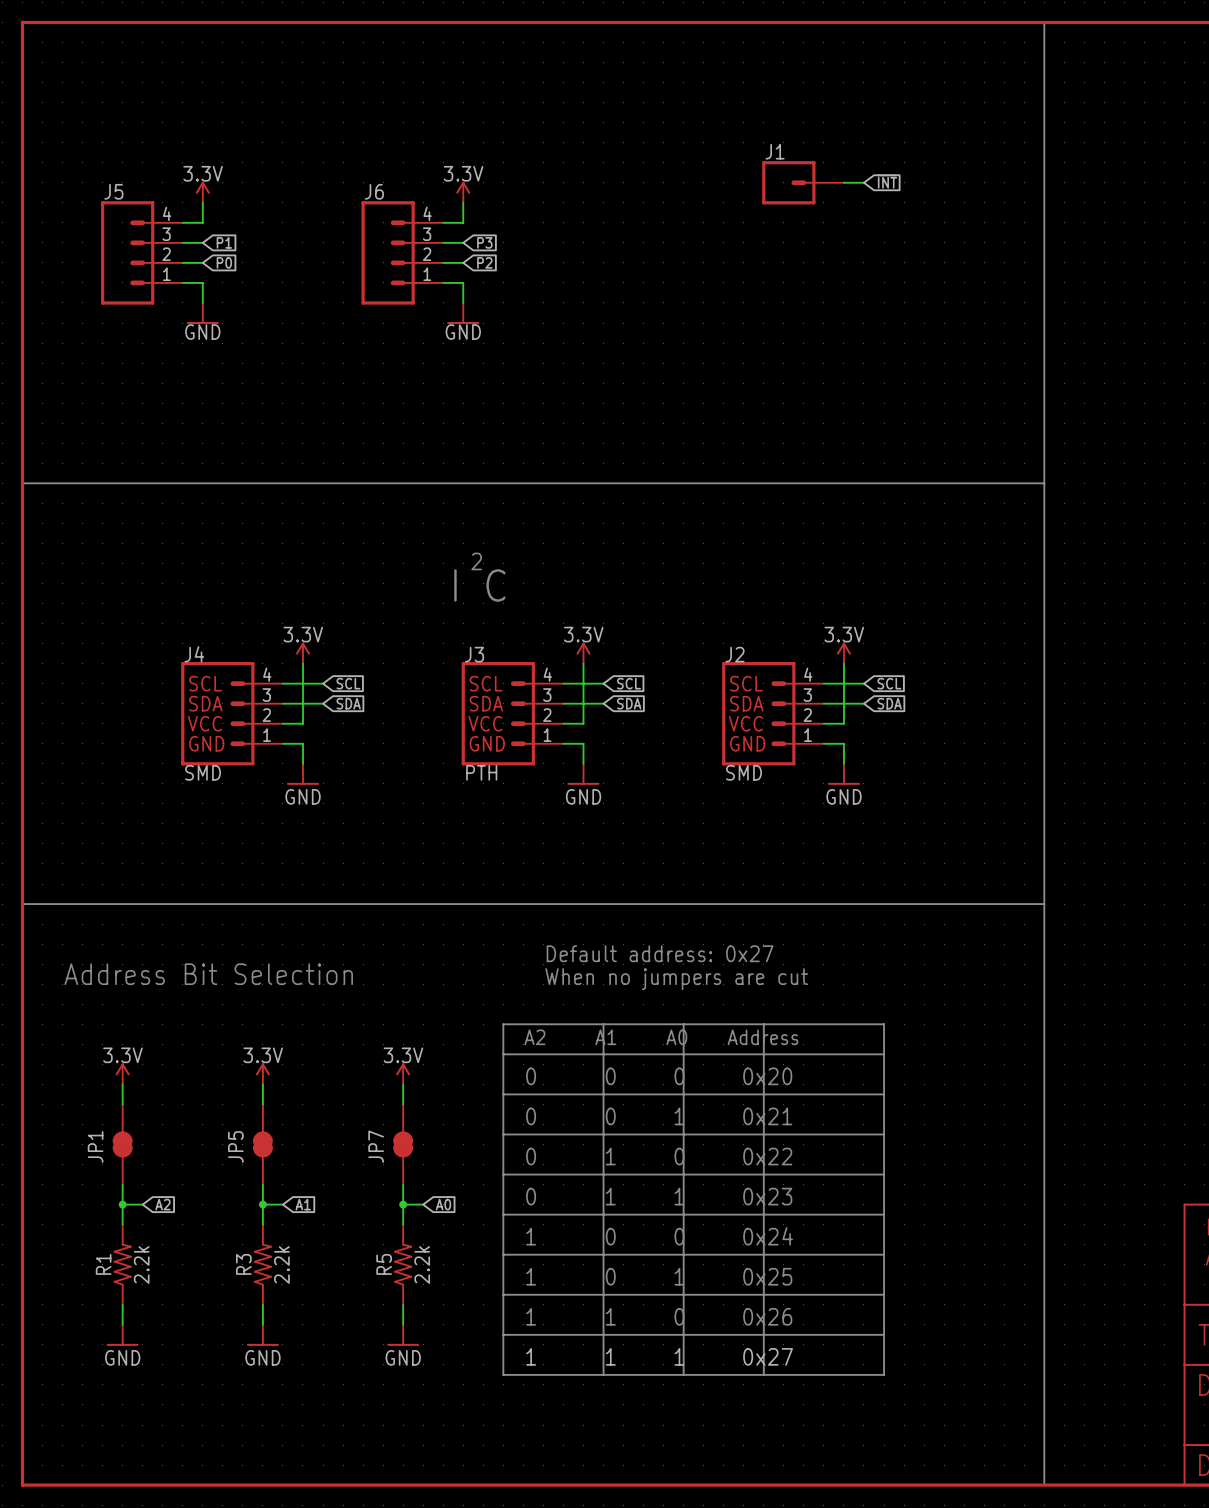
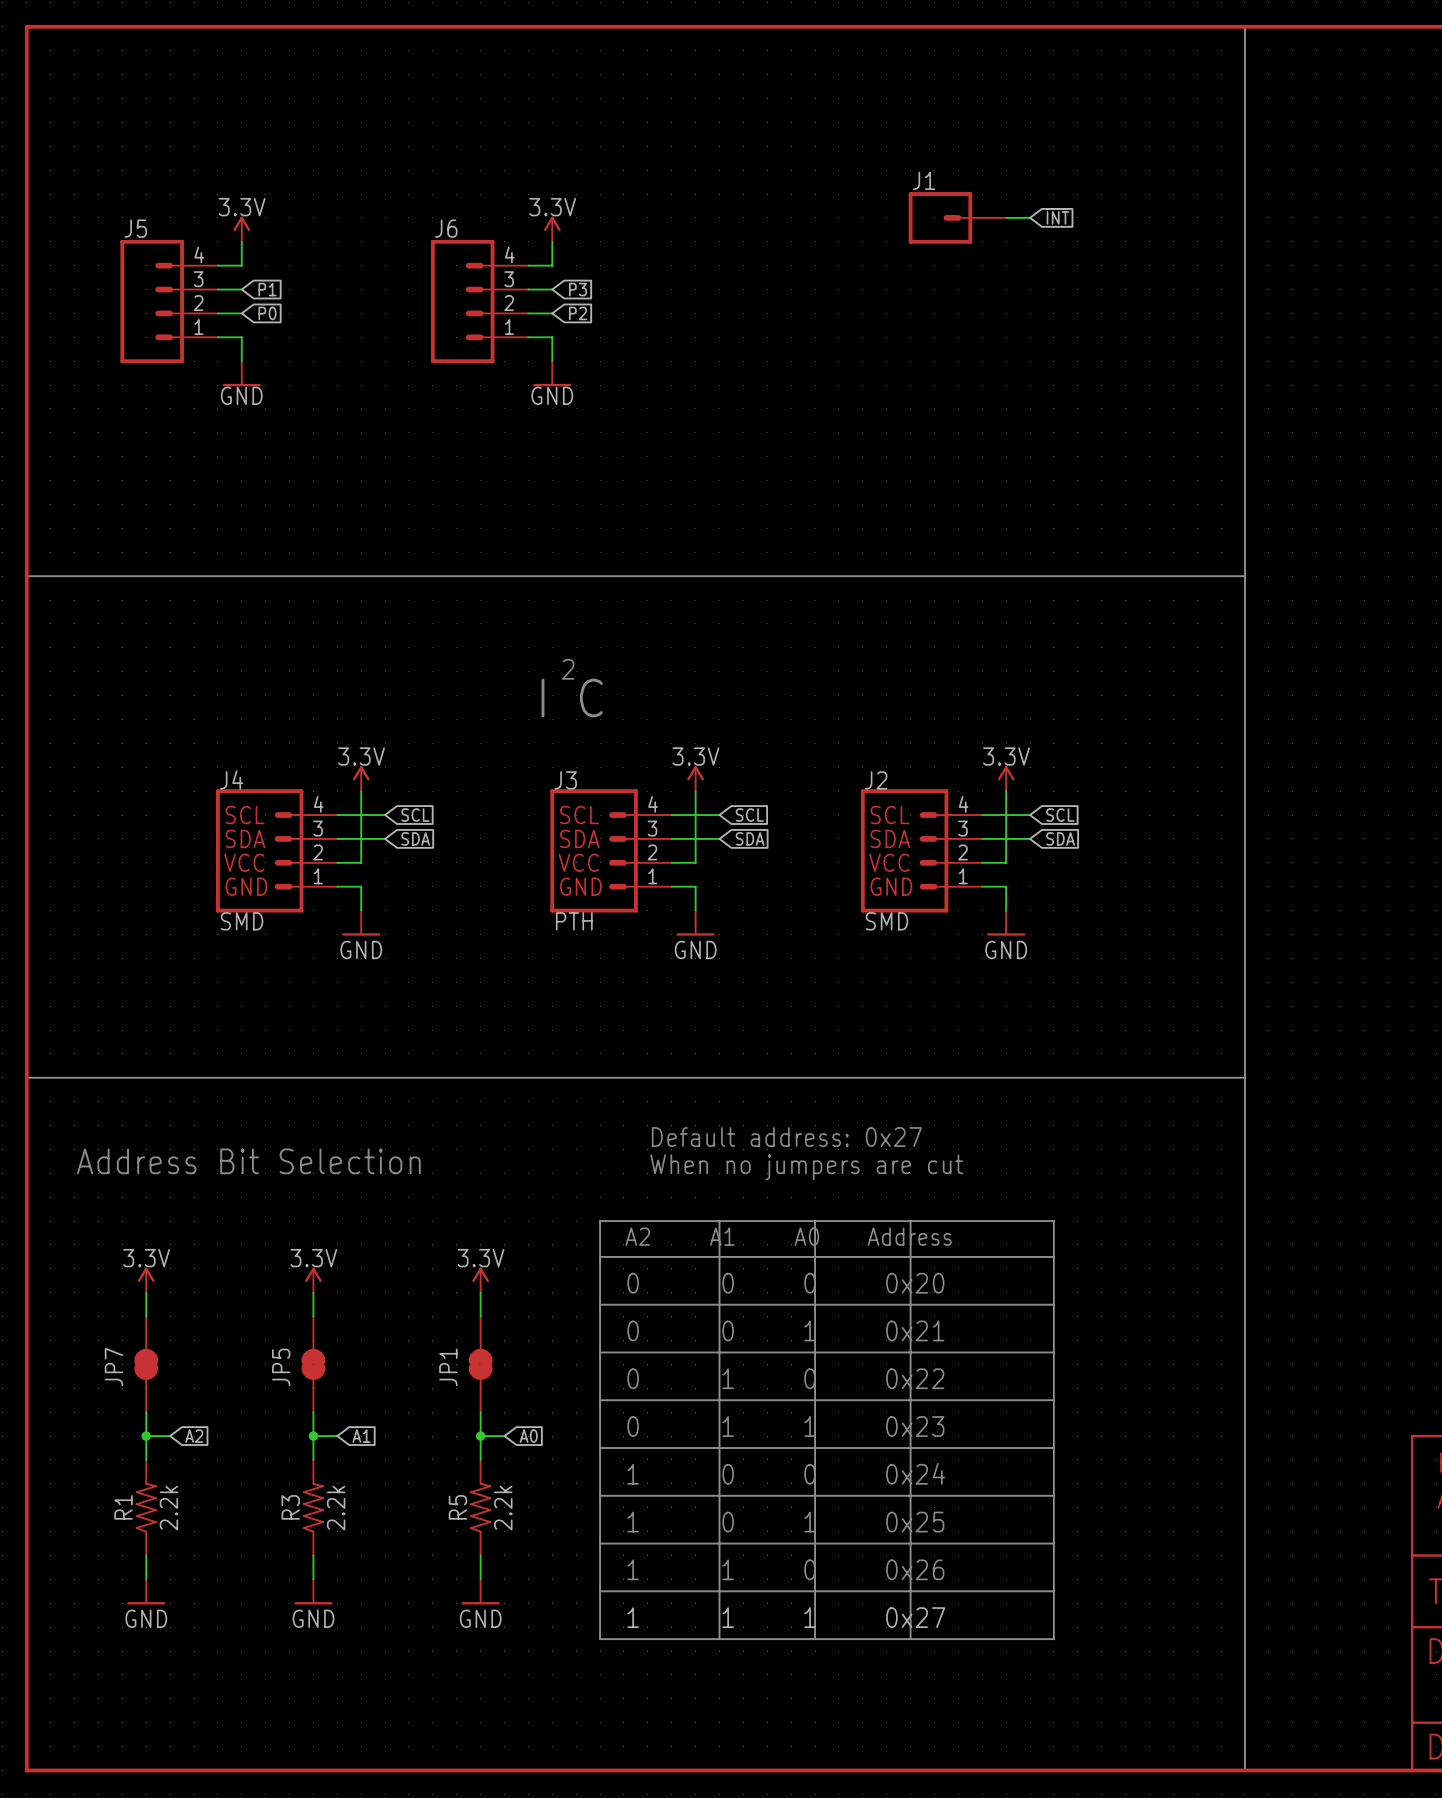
JP1 name: JP1 (95, 1146) -> JP7 (113, 1367)
JP7 name: JP7 (376, 1146) -> JP1 (448, 1367)

